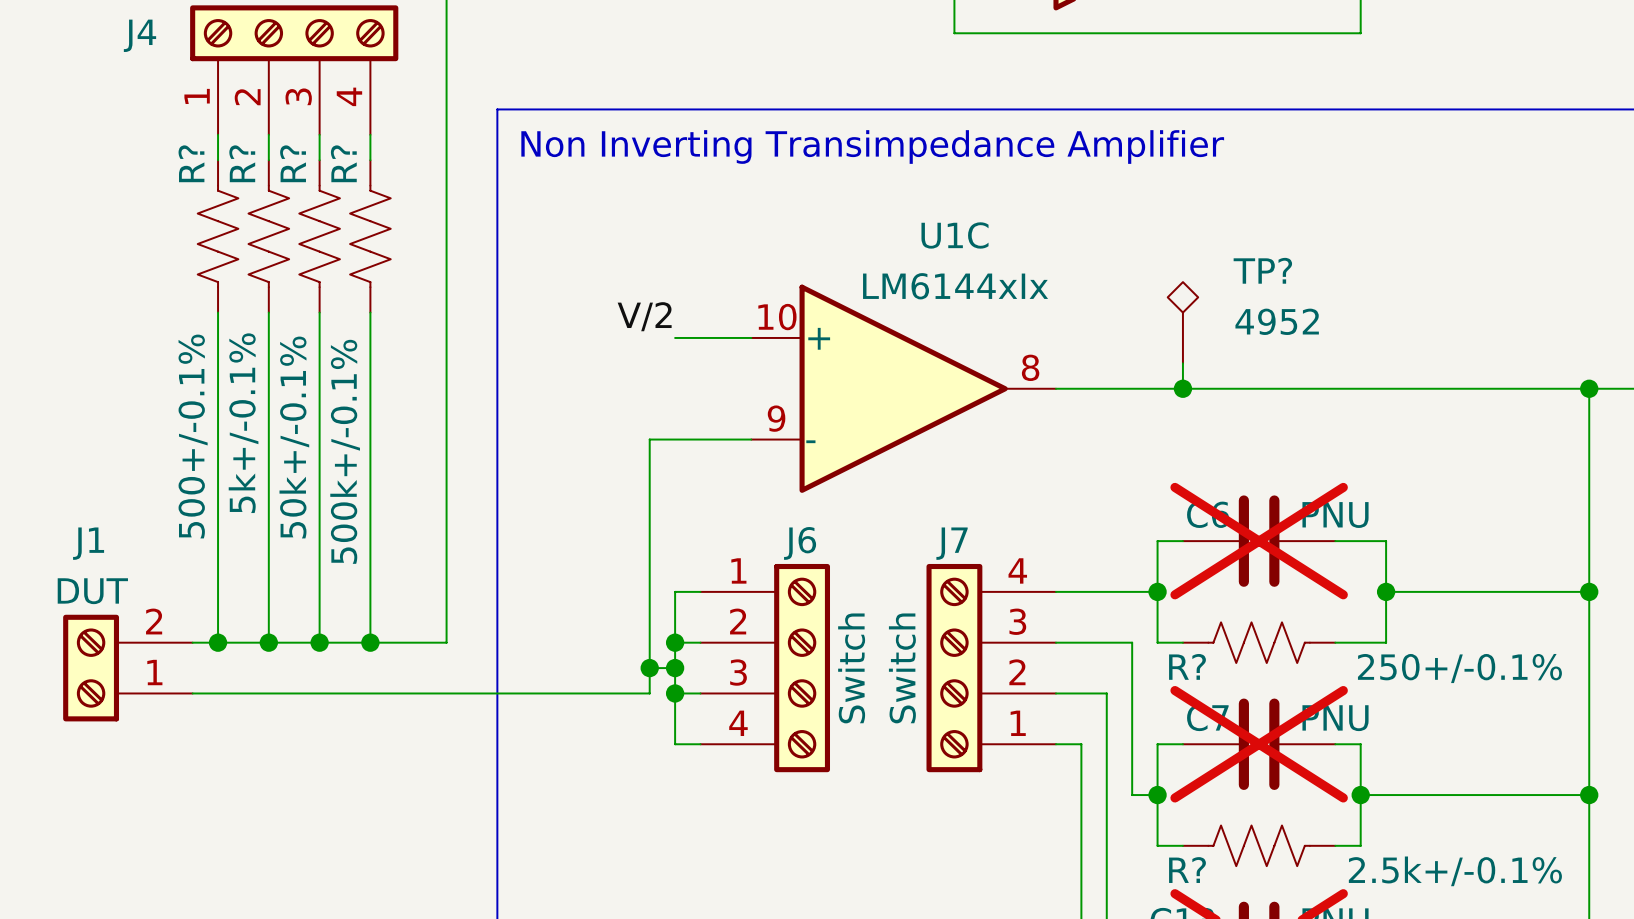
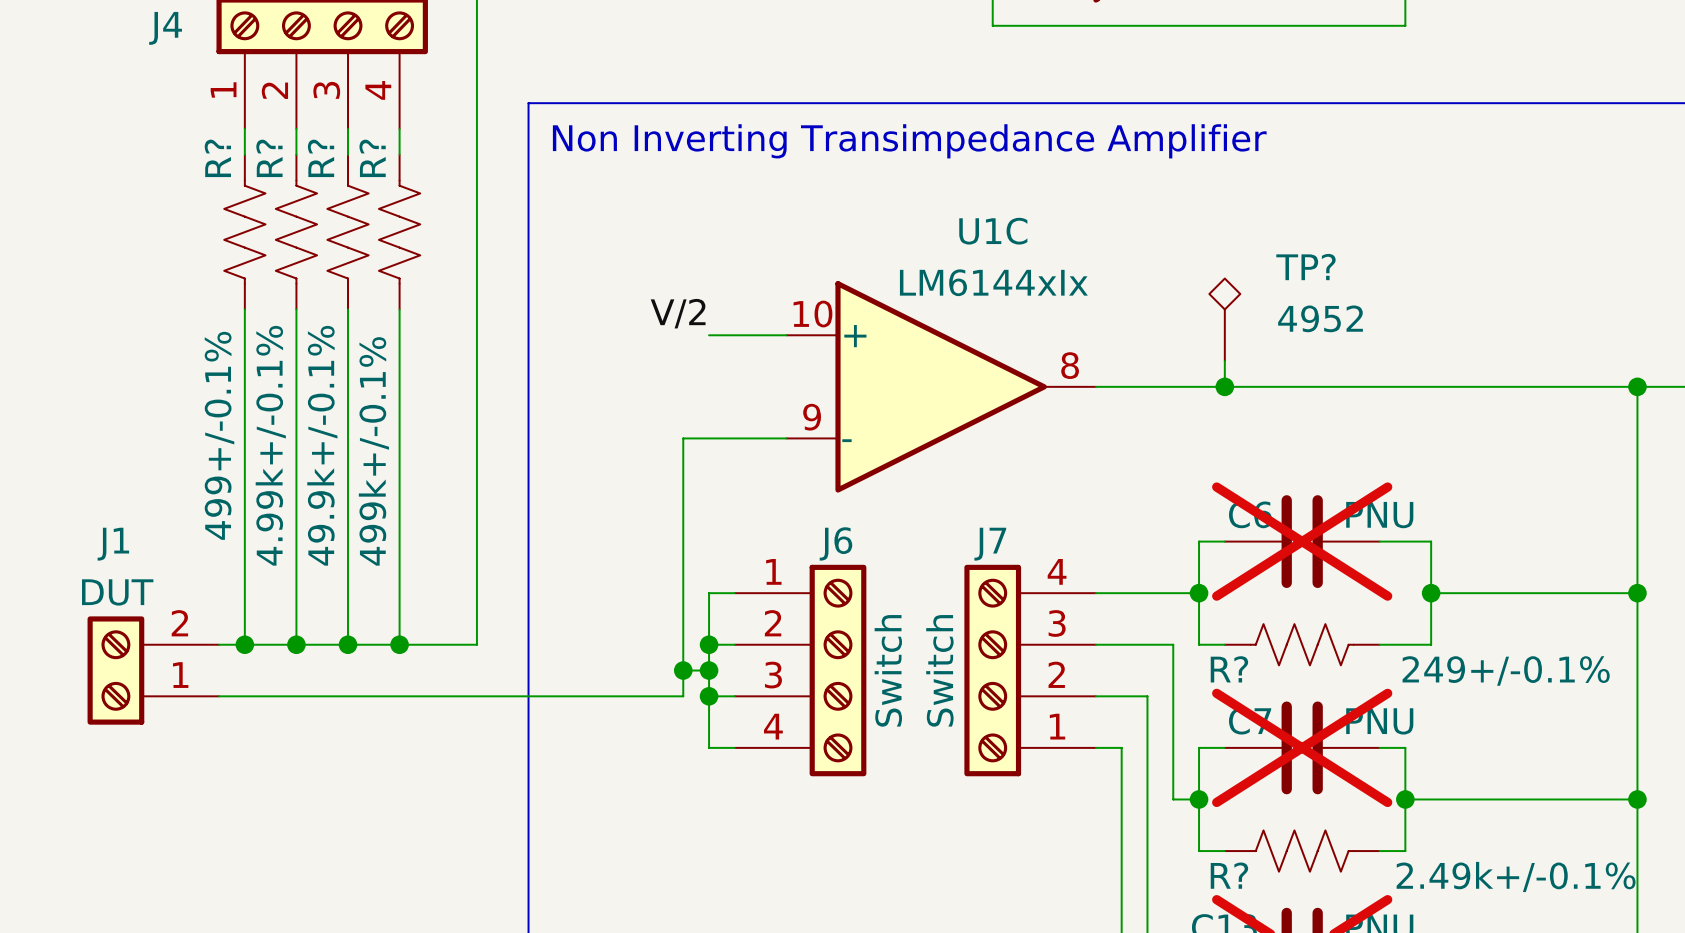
R? value: 5k+/-0.1% (243, 423) -> 4.99k+/-0.1% (270, 445)
R? value: 500+/-0.1% (193, 436) -> 499+/-0.1% (219, 435)
R? value: 50k+/-0.1% (294, 437) -> 49.9k+/-0.1% (322, 445)
R? value: 500k+/-0.1% (345, 451) -> 499k+/-0.1% (373, 451)
R? value: 250+/-0.1% (1459, 668) -> 249+/-0.1% (1506, 670)
R? value: 2.5k+/-0.1% (1455, 871) -> 2.49k+/-0.1% (1516, 876)

